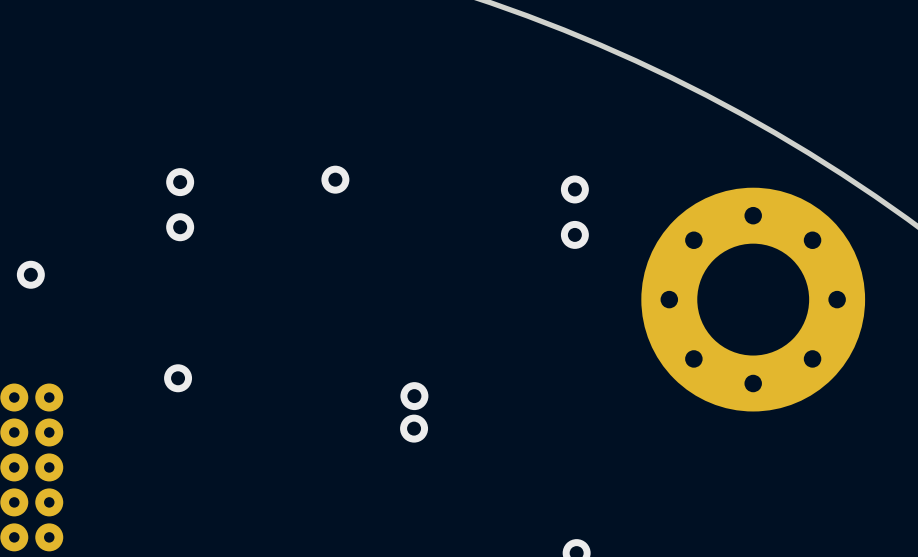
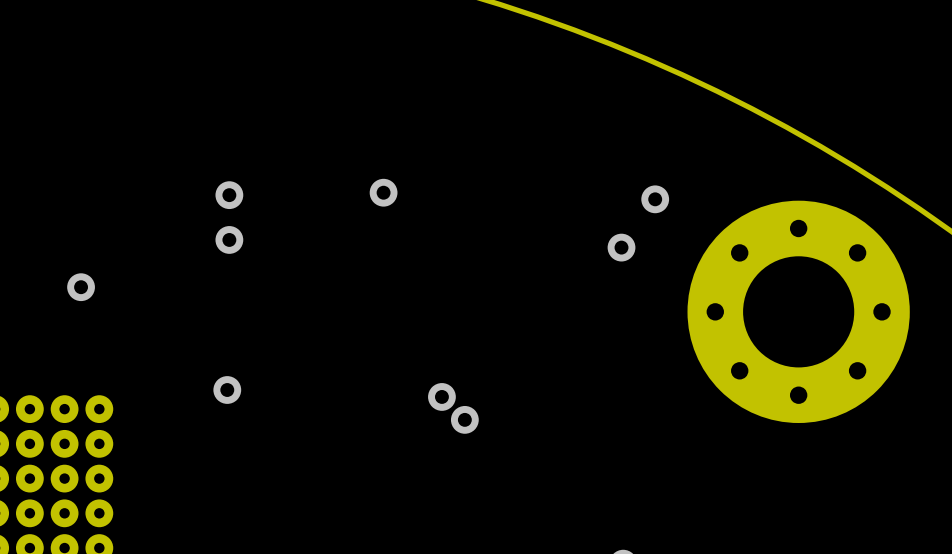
via position: (574, 189) -> (655, 199)
via: none -> (441, 396)
via: (414, 396) -> none
via: none -> (464, 419)
via: (414, 428) -> none

